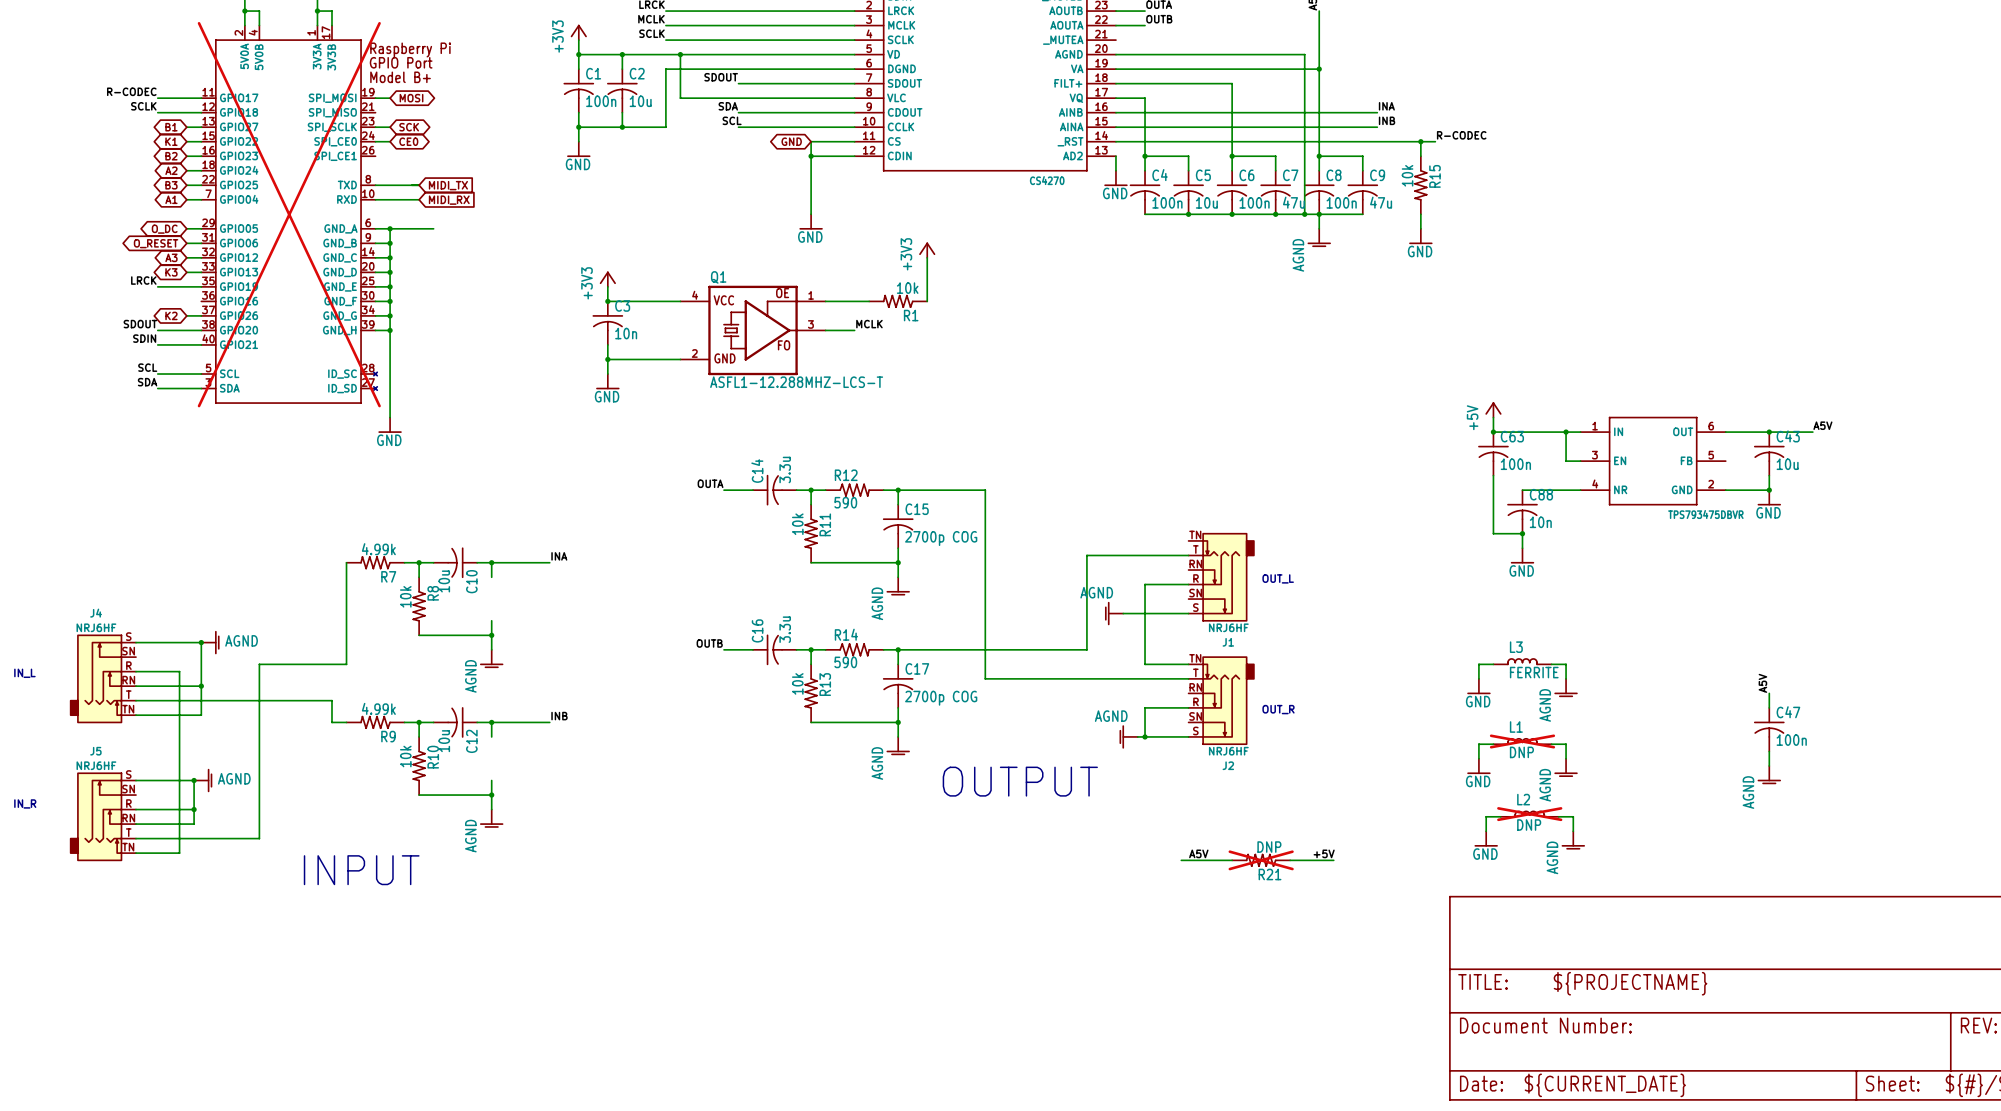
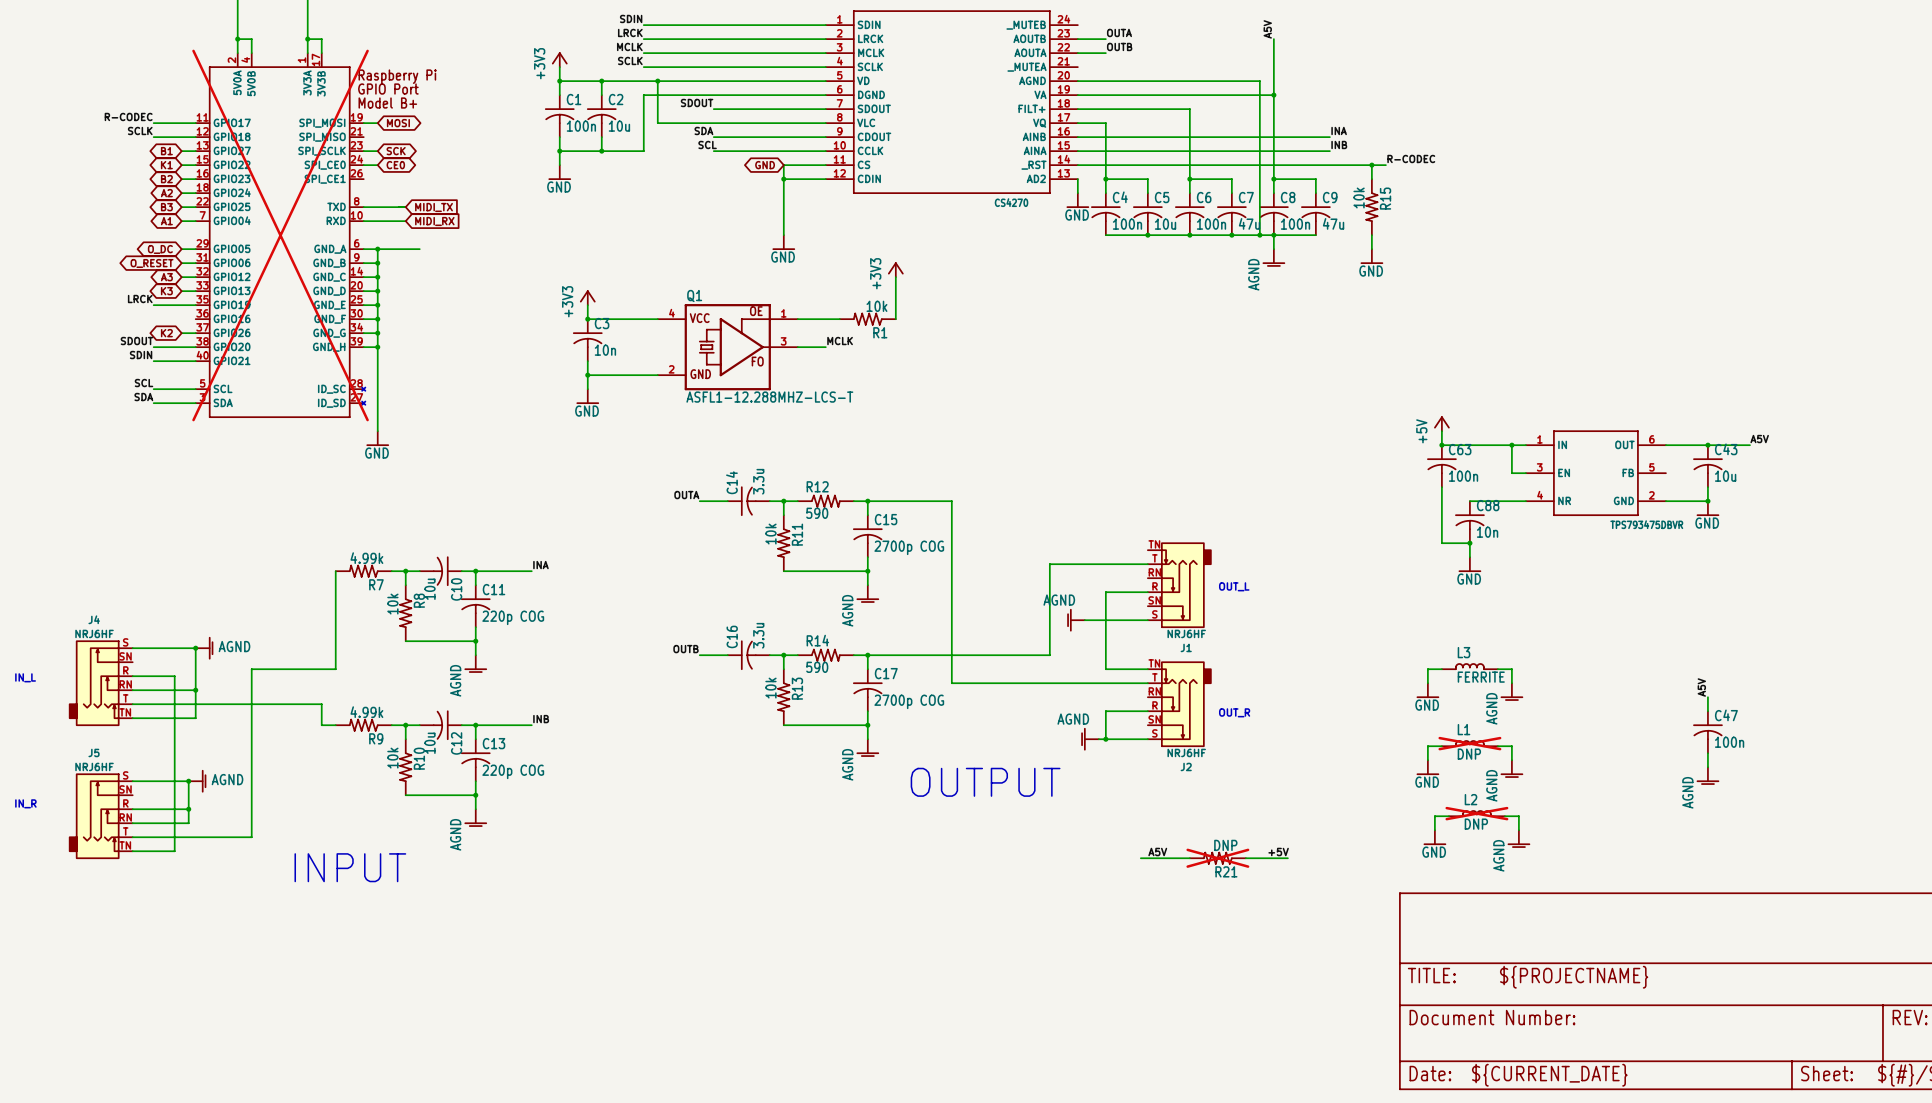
C11: none -> 220p COG (475, 606)
C13: none -> 220p COG (475, 760)

